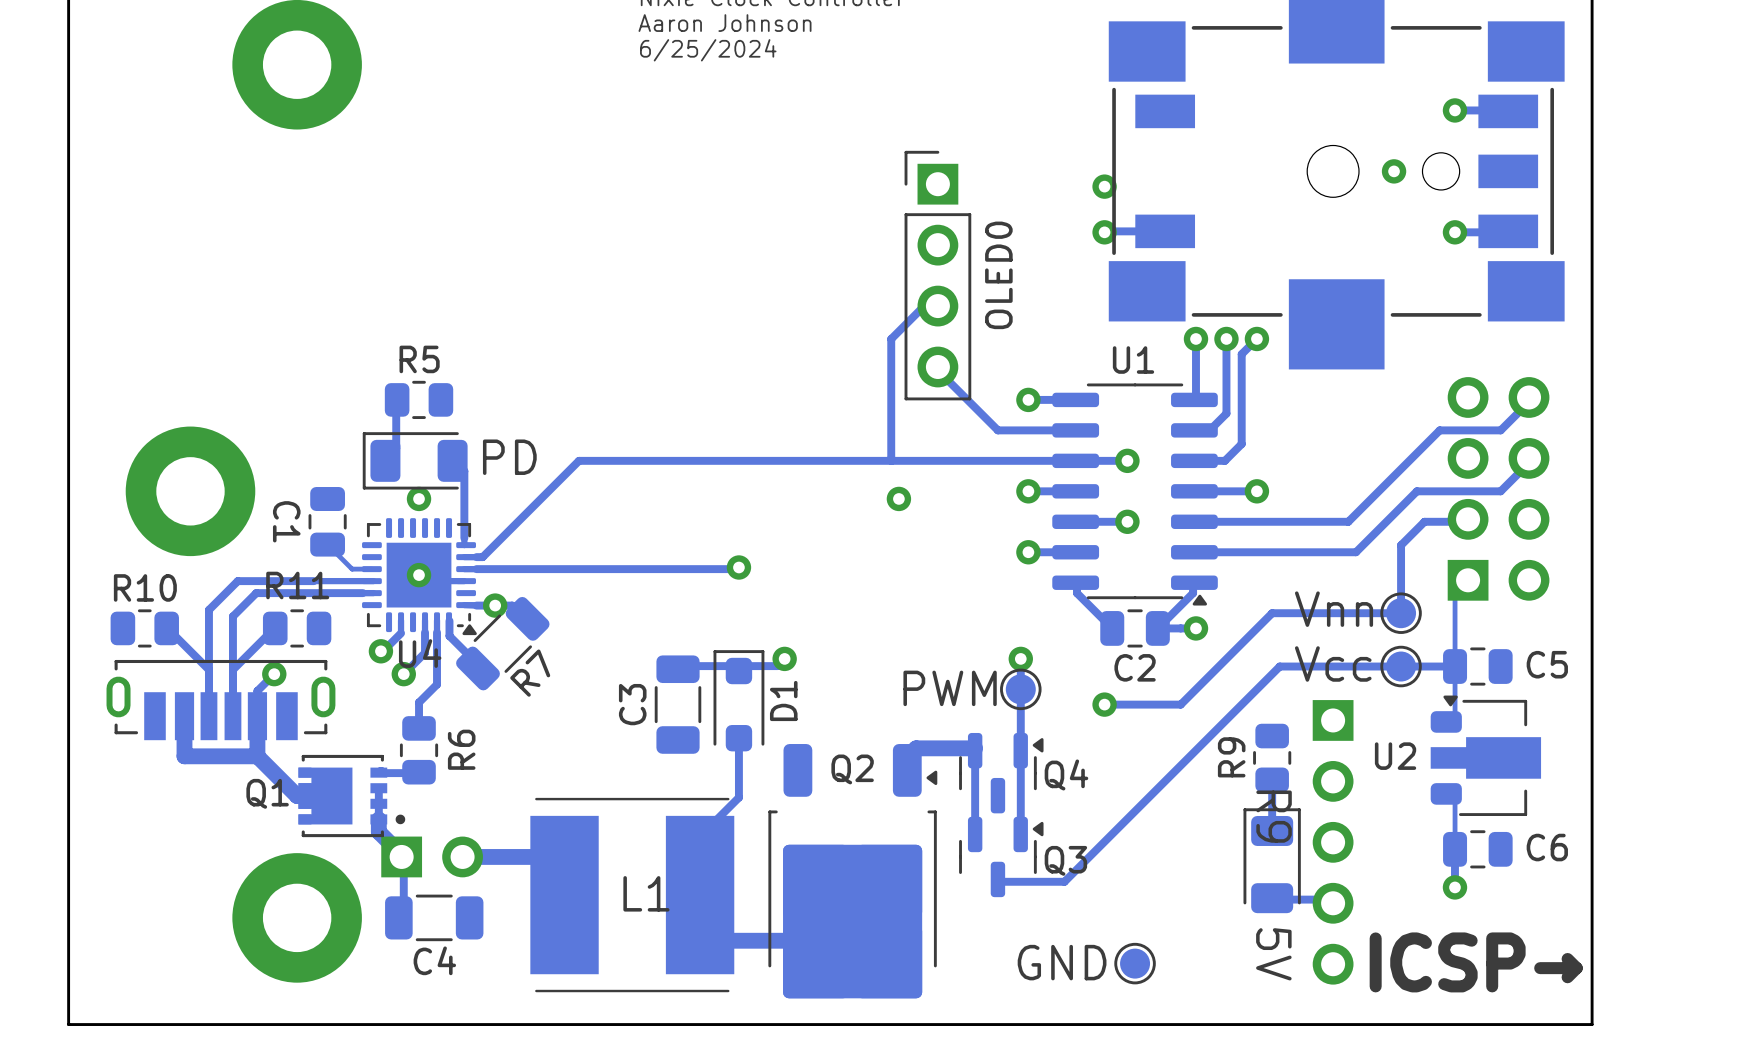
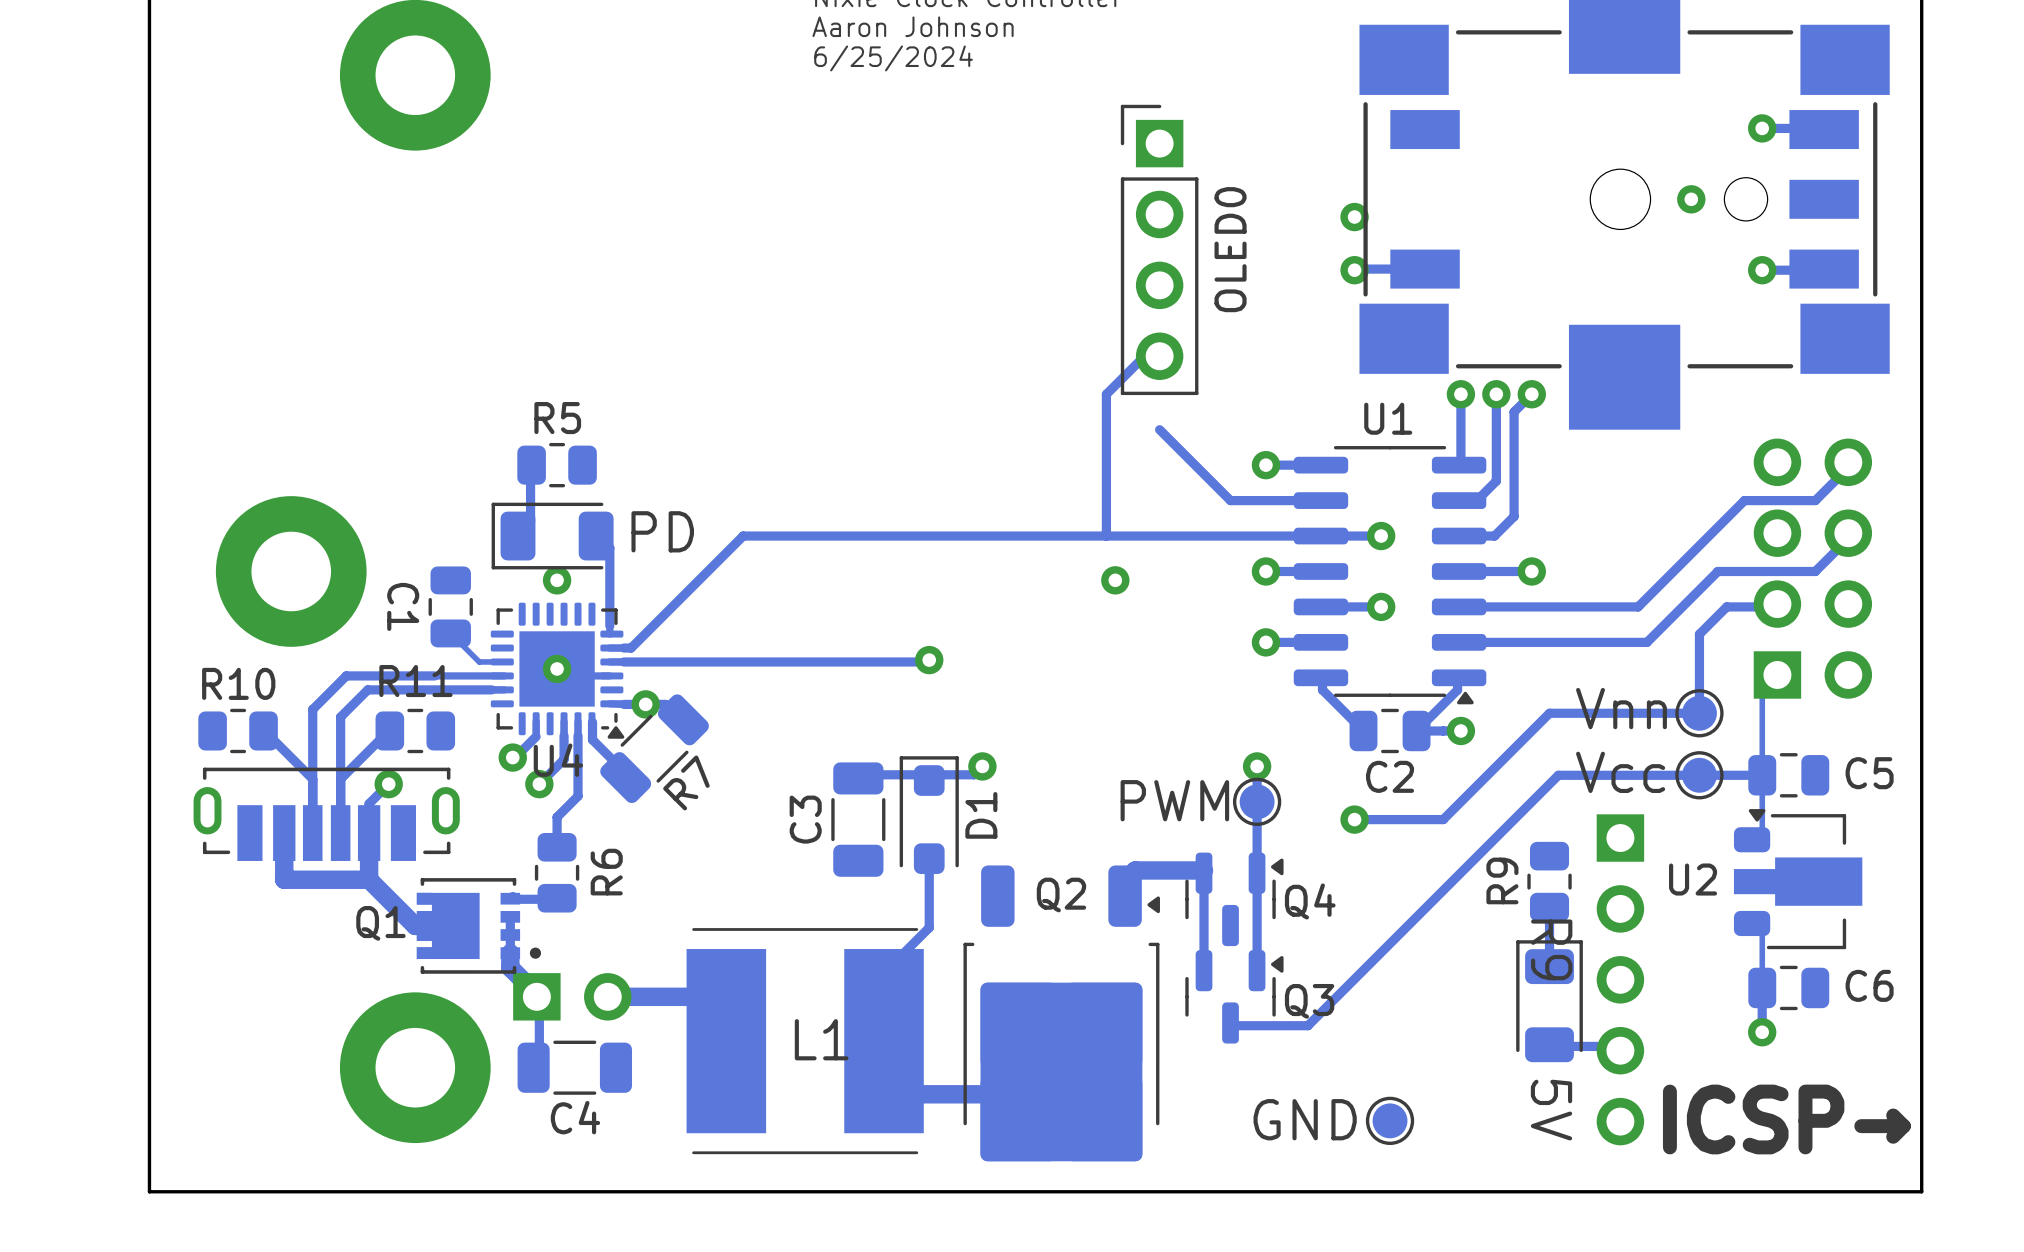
OLED0 position: (937, 275) -> (1159, 249)

